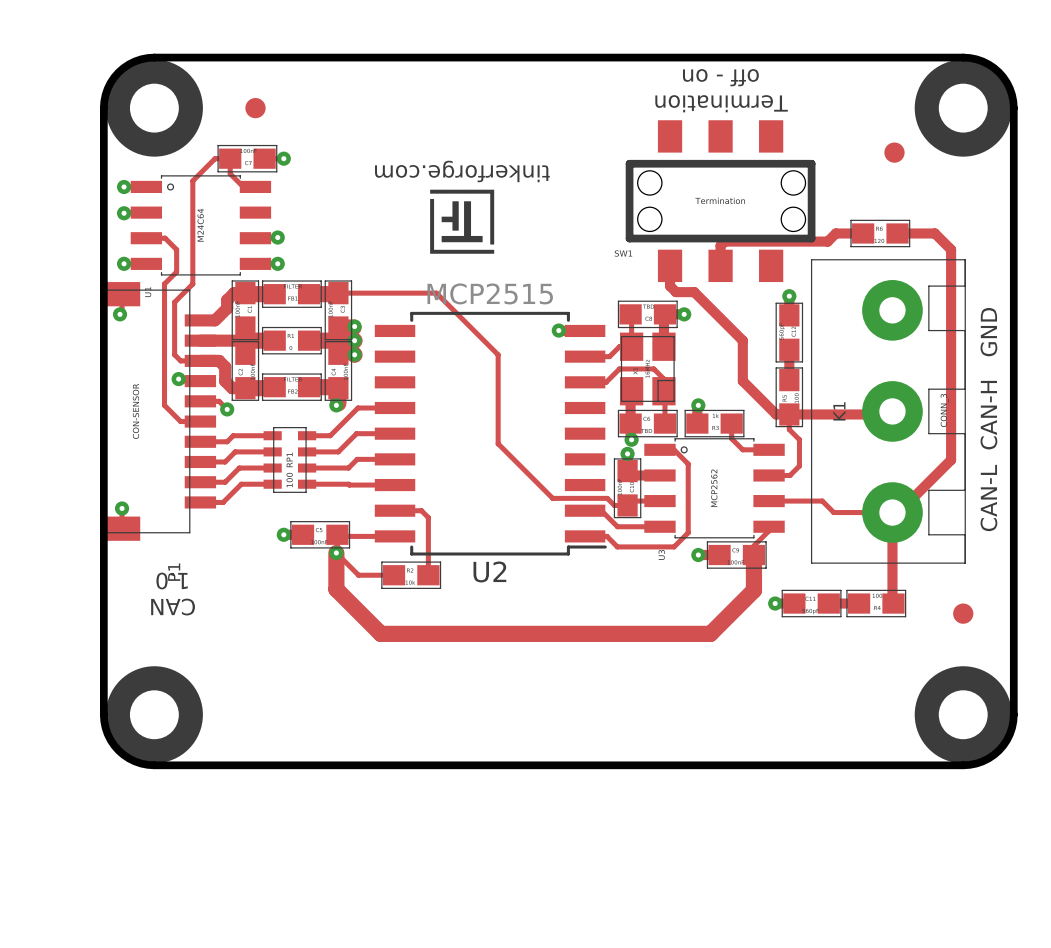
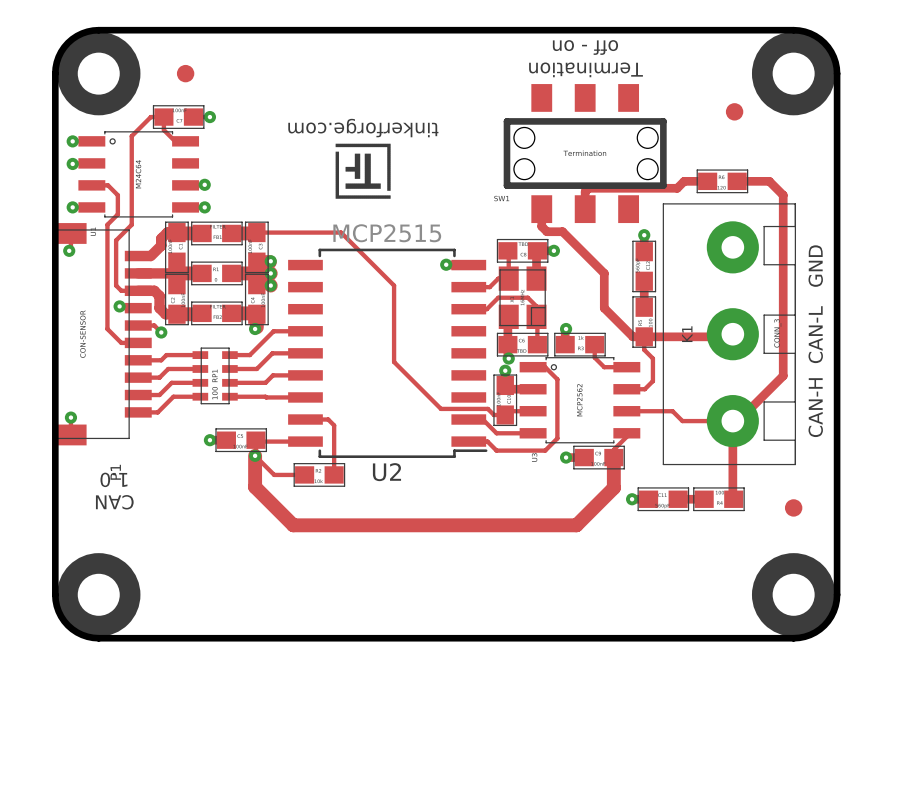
text: CAN-L CAN-H GND (988, 419) -> CAN-H CAN-L GND (815, 341)

